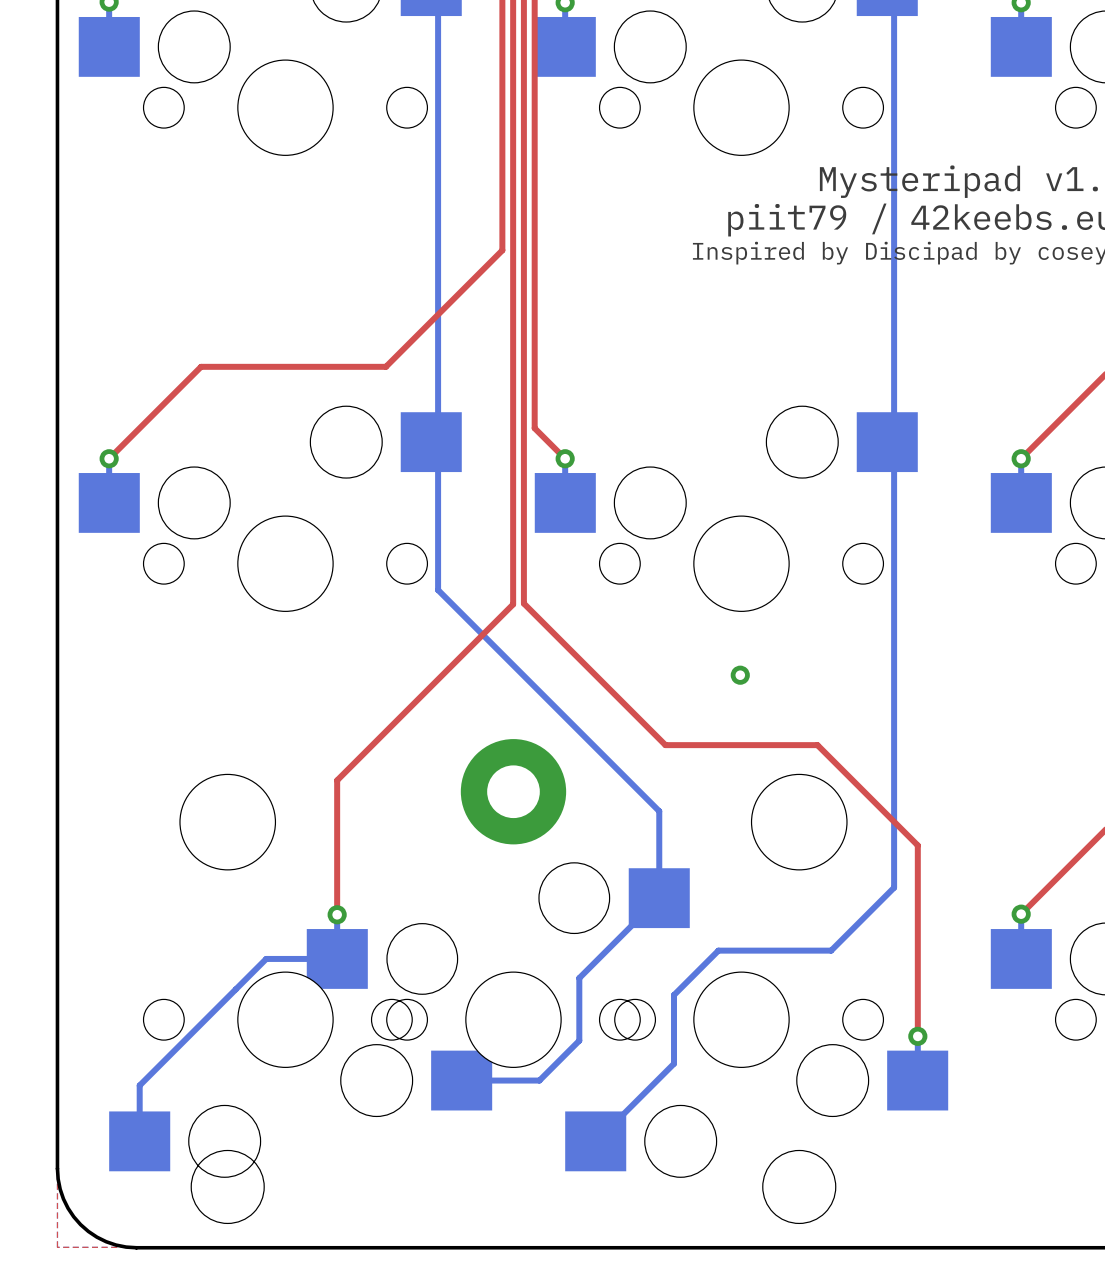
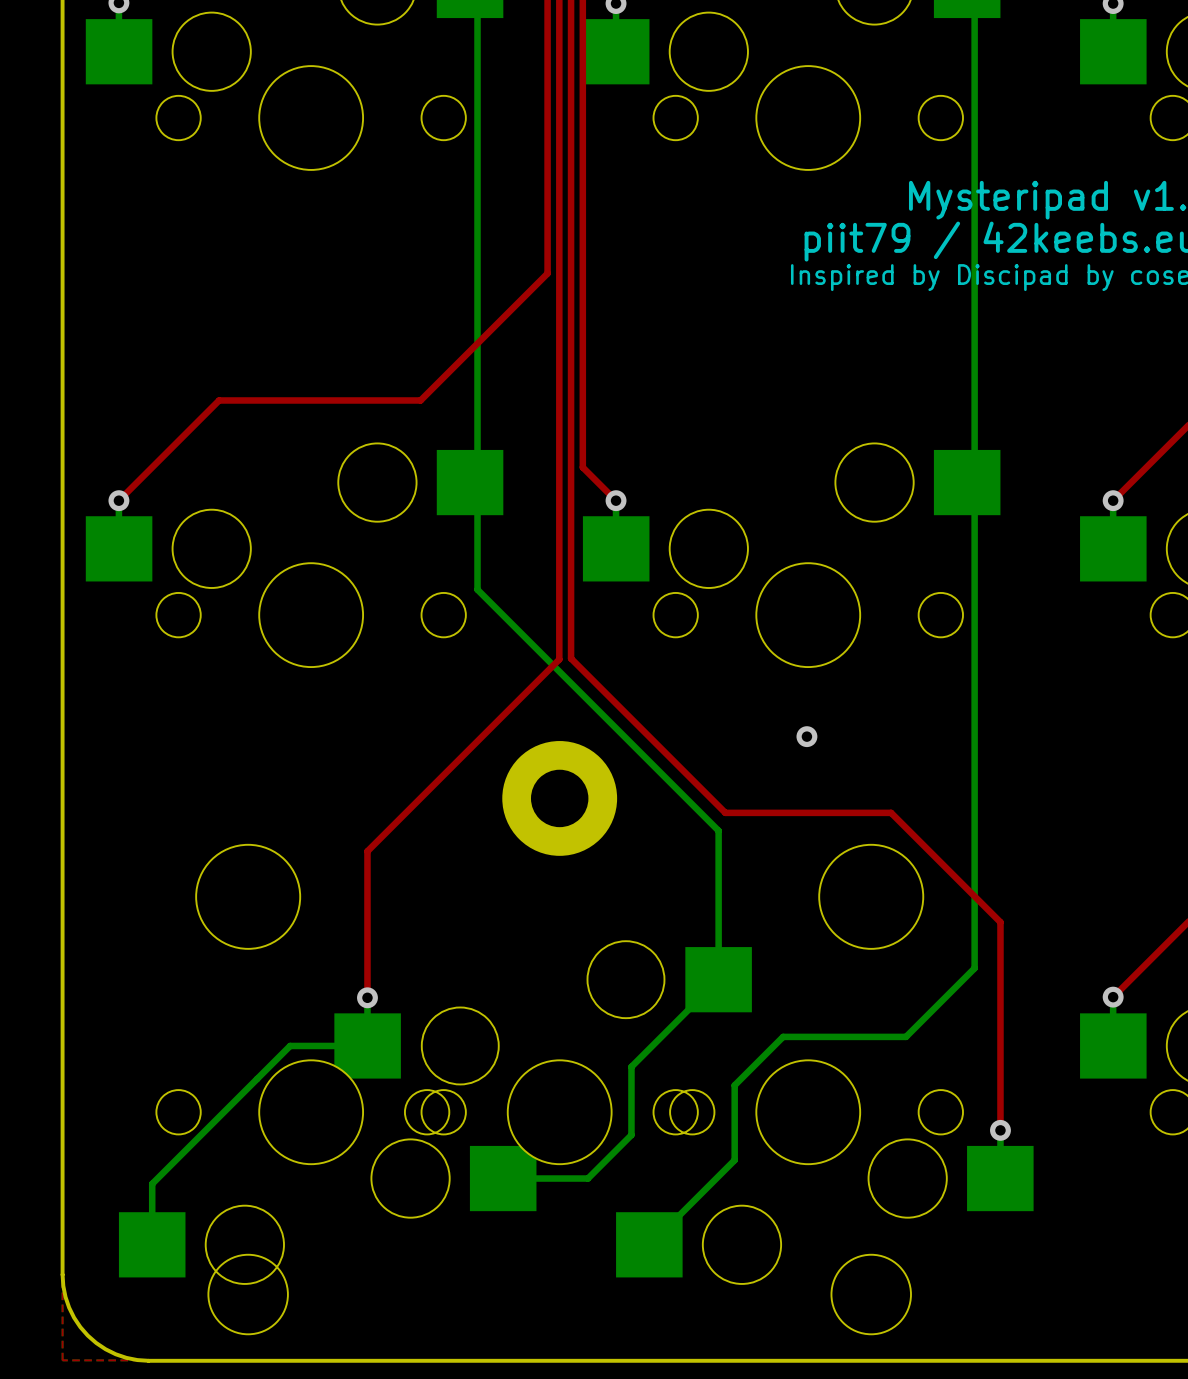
bottom track: (438, 540) (438, 590) (659, 811) -> (477, 589) (718, 830) (718, 884)
part position: (513, 791) -> (559, 798)

